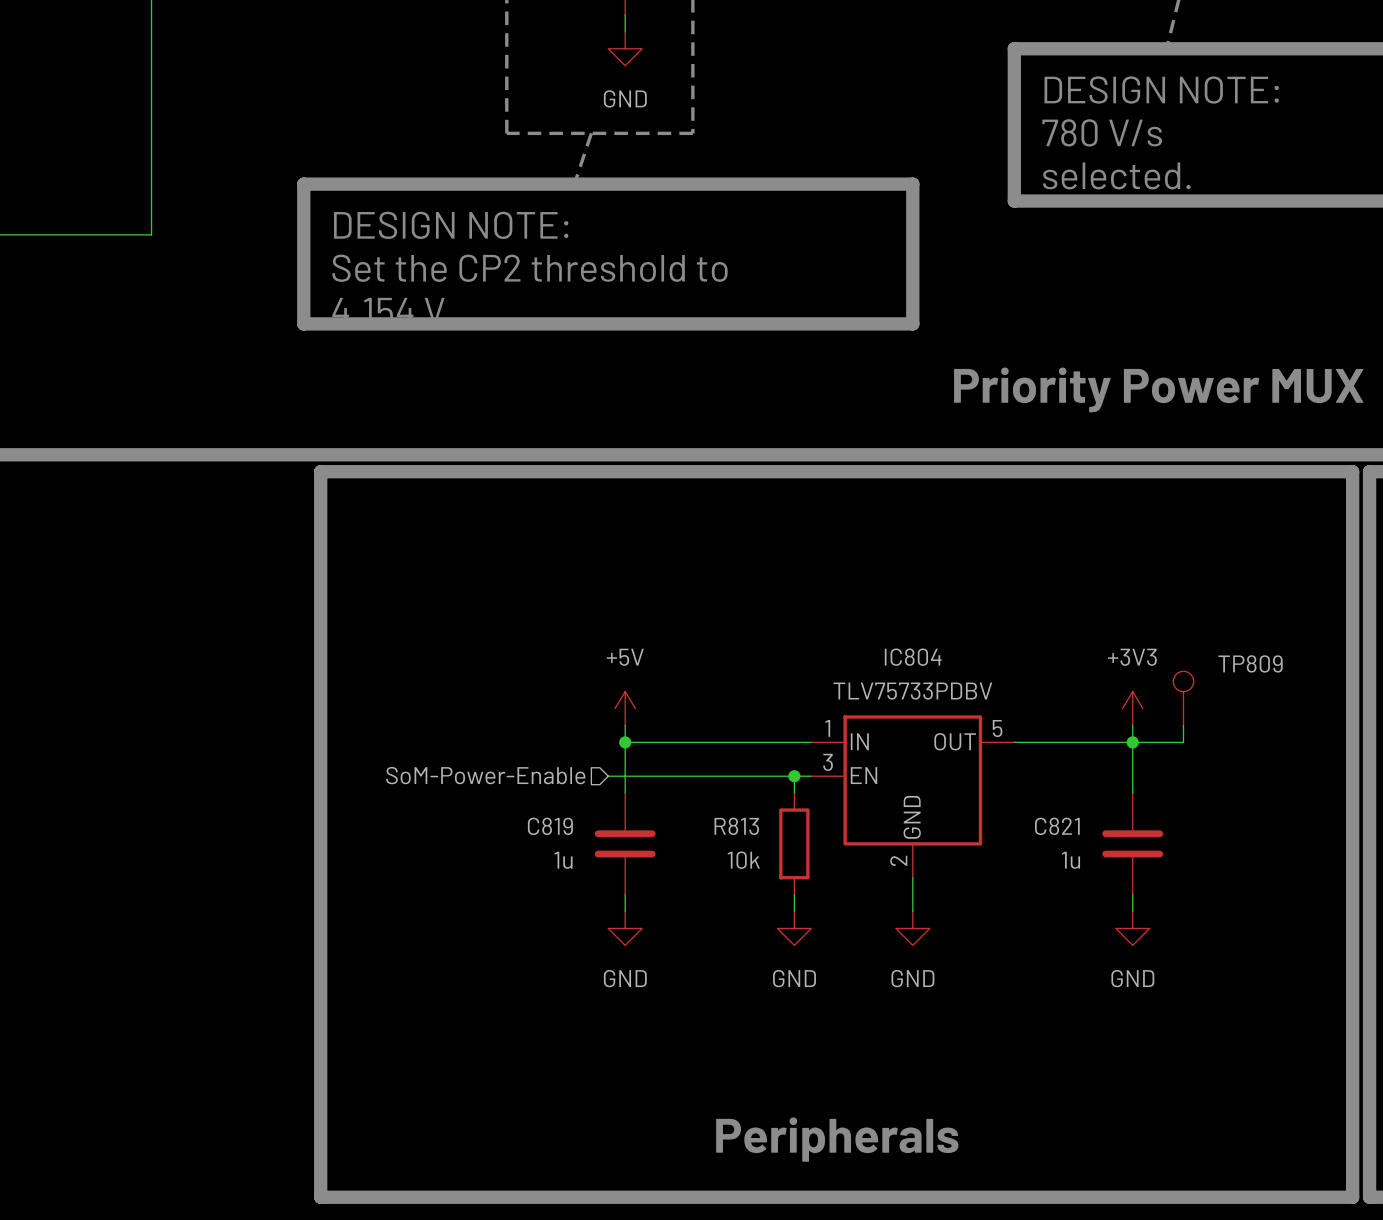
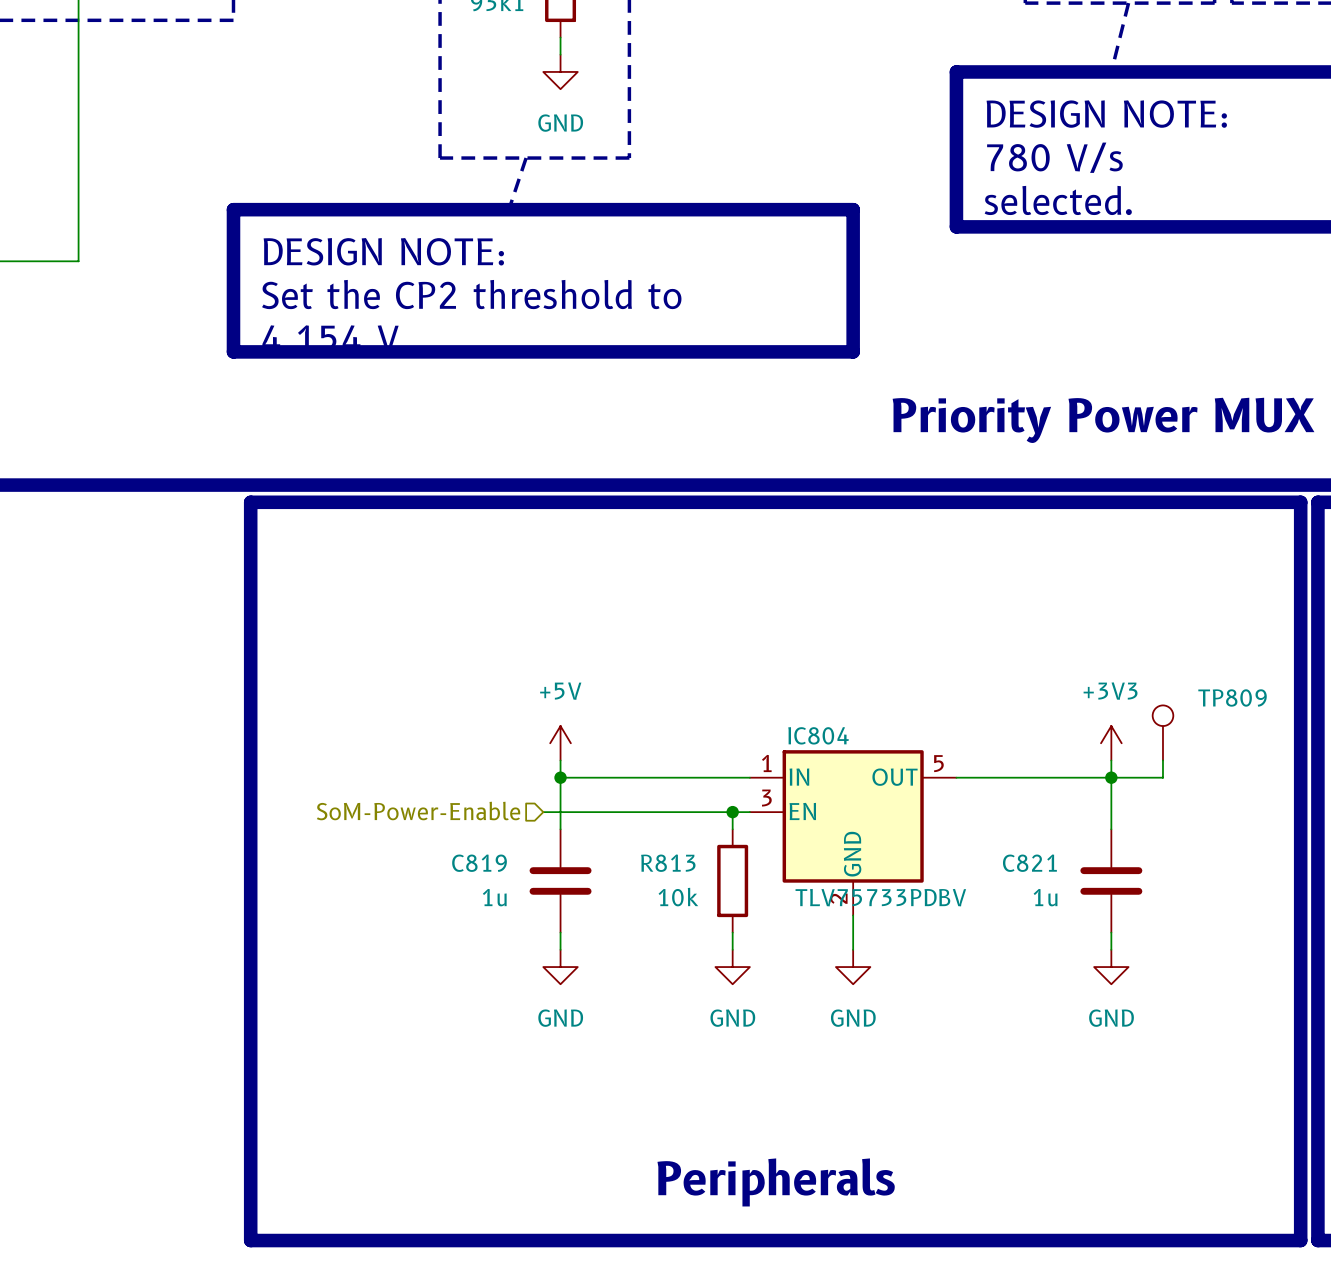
IC804 name position: IC804 (913, 657) -> IC804 (818, 735)
IC804 value position: TLV75733PDBV (912, 691) -> TLV75733PDBV (880, 897)
TP809 position: (1183, 698) -> (1162, 732)
power symbol position: +3V3 (1132, 708) -> +3V3 (1111, 743)
wire: (1132, 725) (1132, 793) -> (1111, 760) (1111, 829)
wire: (1183, 725) (1183, 742) -> (1162, 760) (1162, 777) (1128, 777)
junction position: (1132, 742) -> (1111, 777)
C821 position: (1132, 843) -> (1111, 880)
wire: (1132, 894) (1132, 911) -> (1111, 932) (1111, 949)
power symbol position: GND (1132, 928) -> GND (1111, 967)

